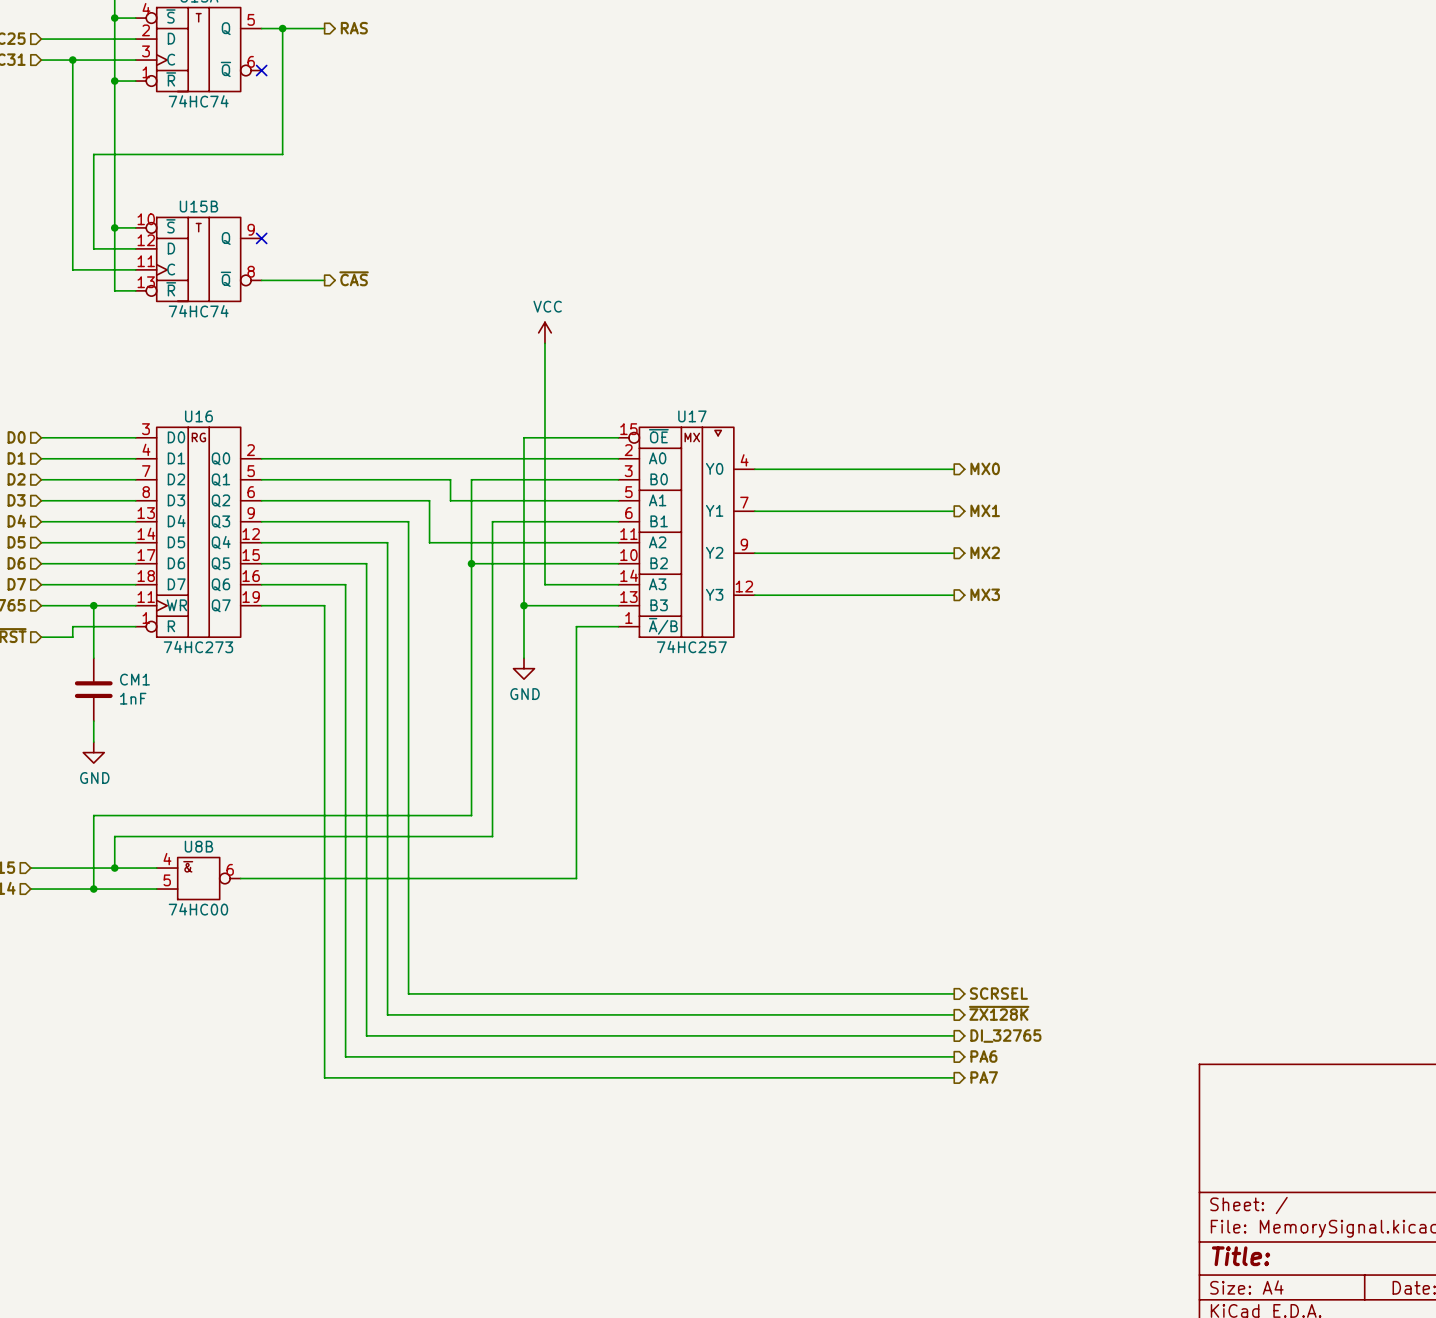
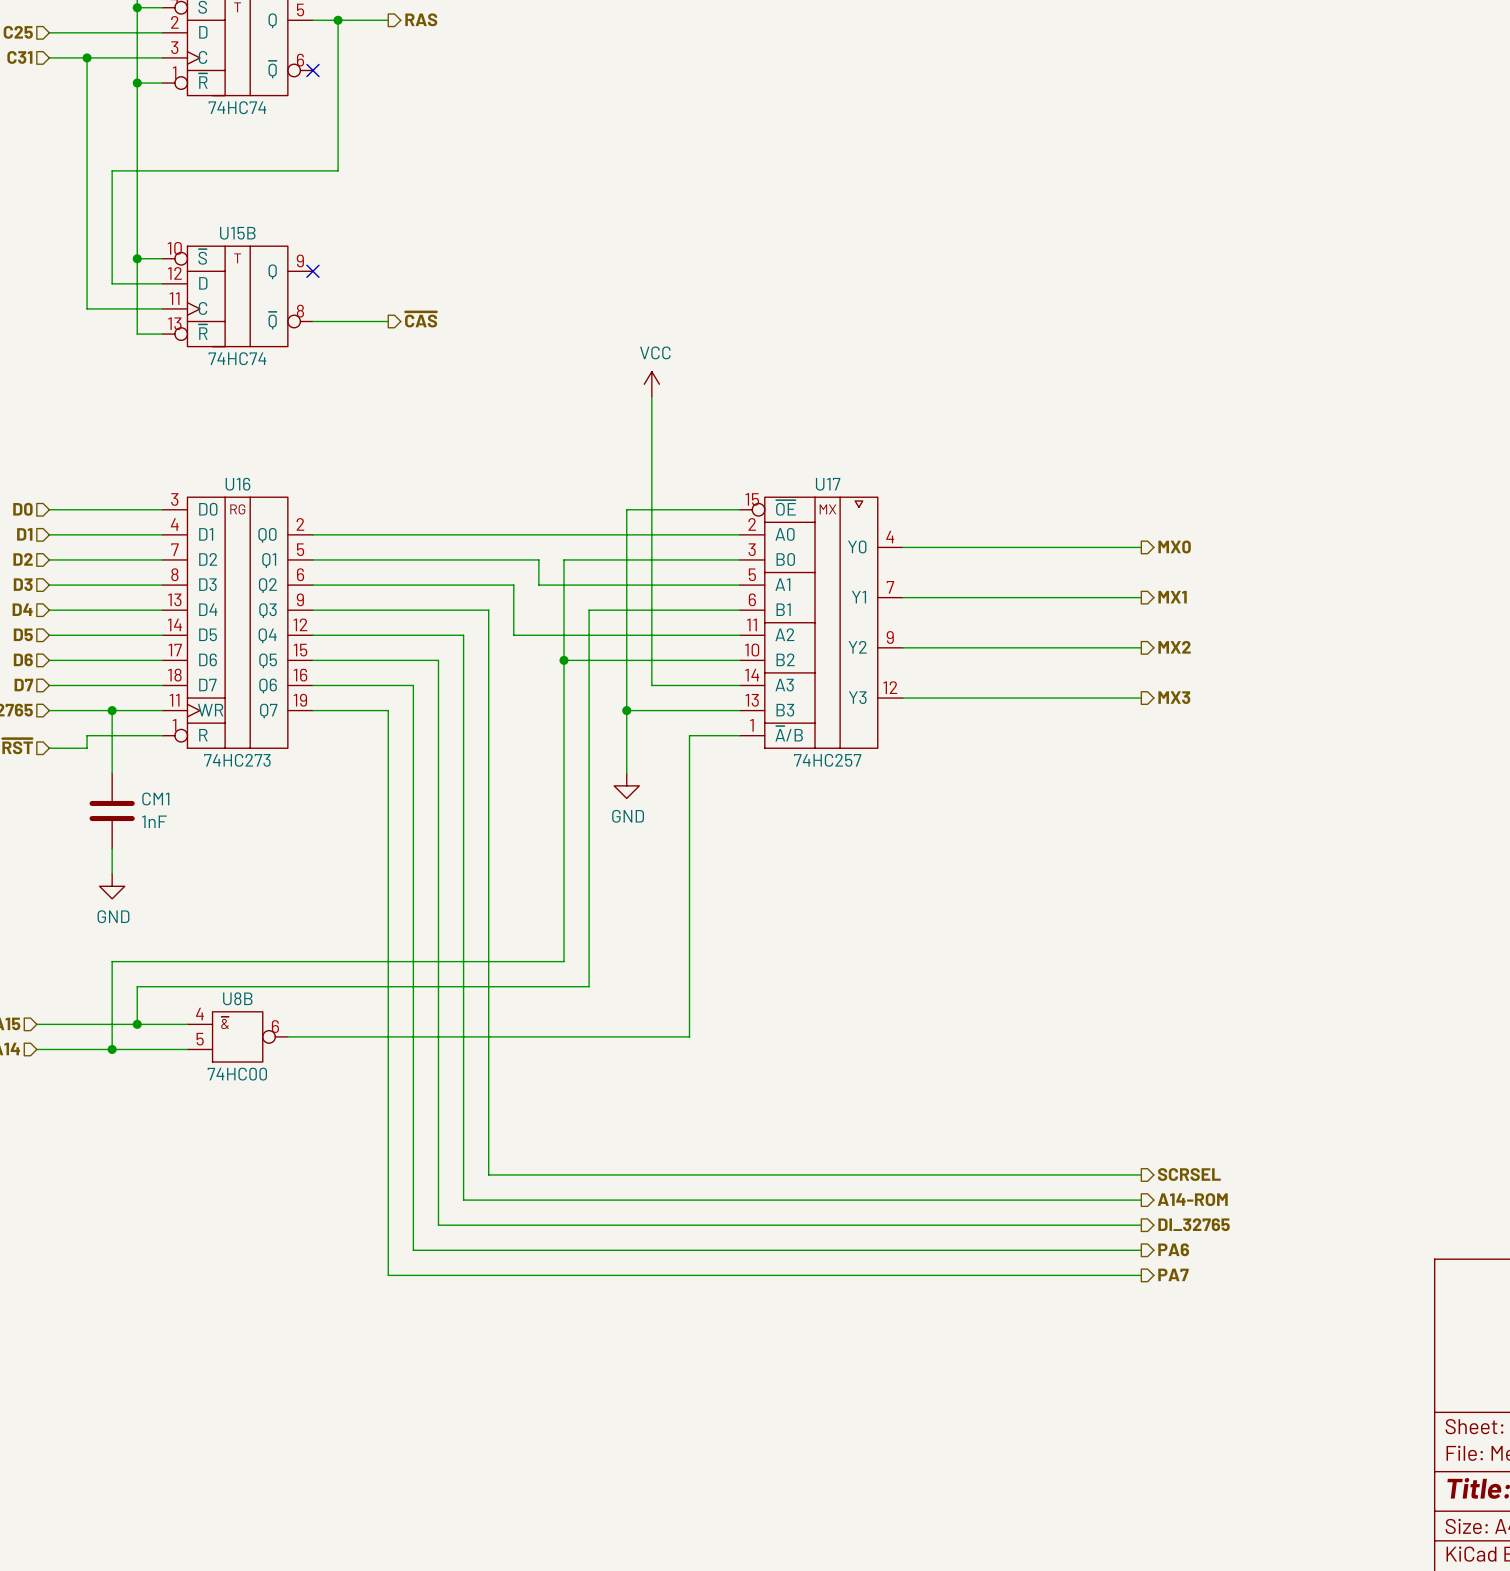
hierarchical label: ~{ZX128K} (999, 1013) -> A14-ROM (1192, 1199)

